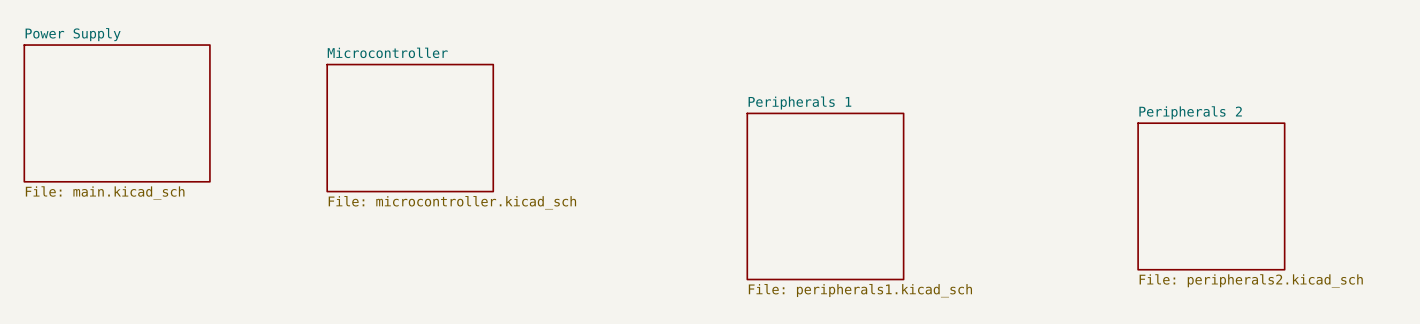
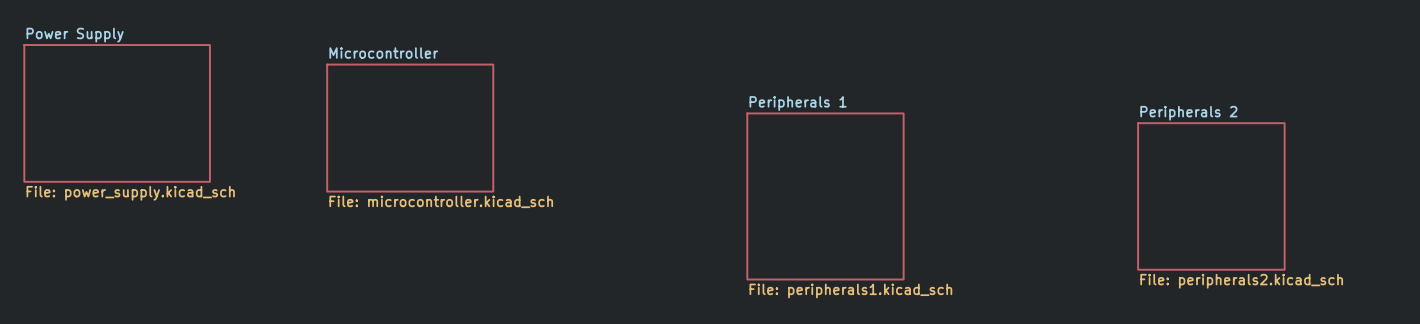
sheet Power Supply value: File: main.kicad_sch (105, 192) -> File: power_supply.kicad_sch (130, 193)

